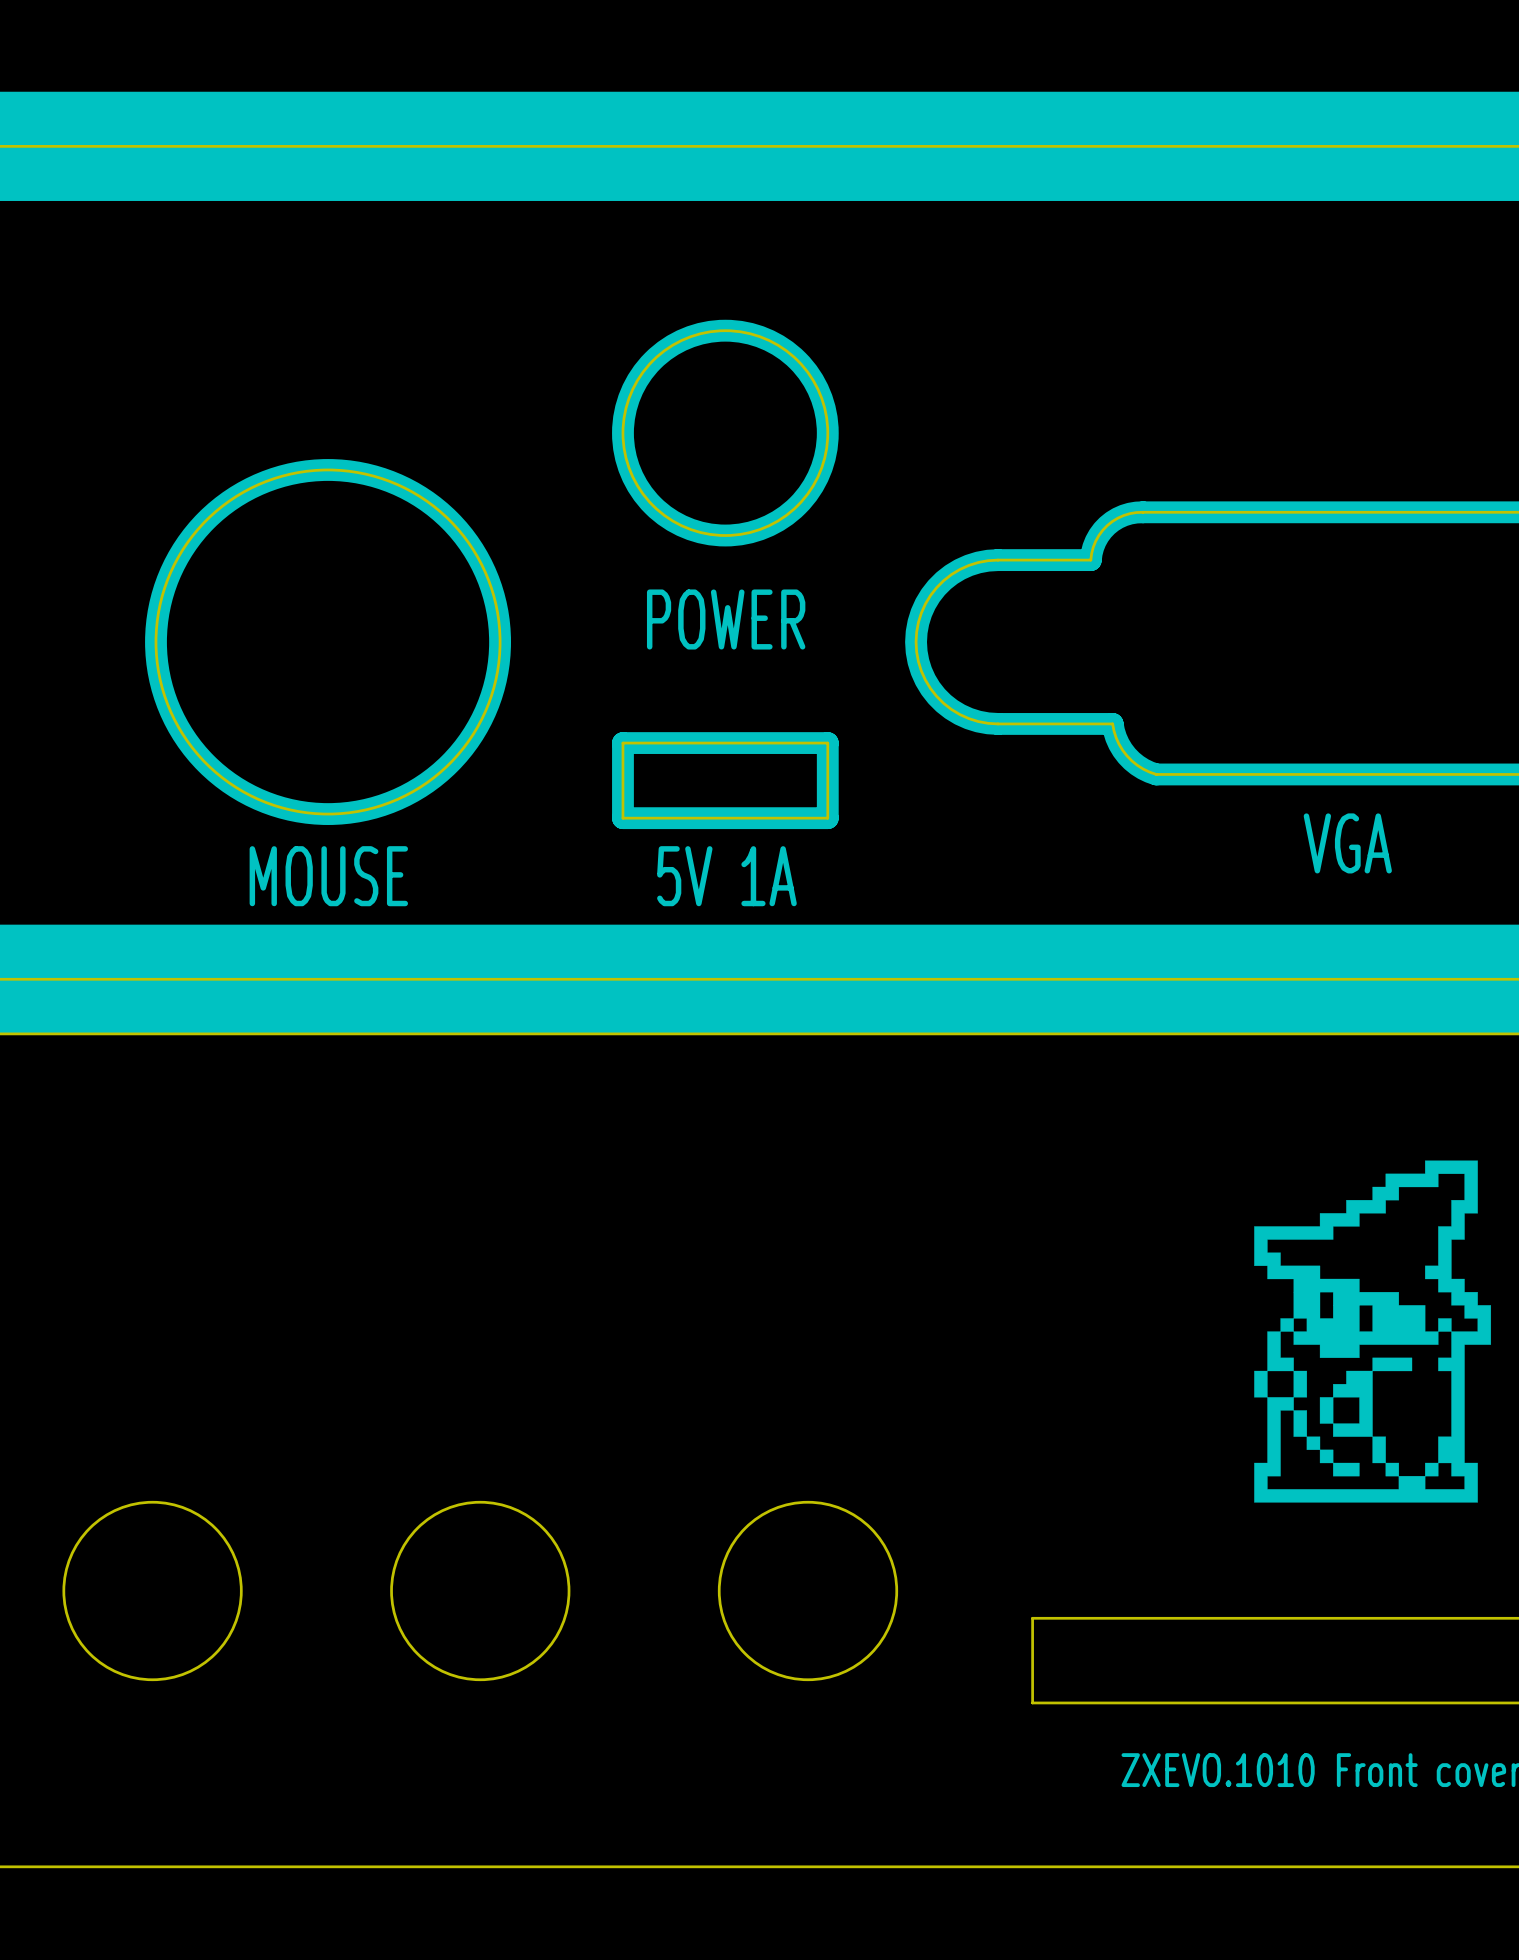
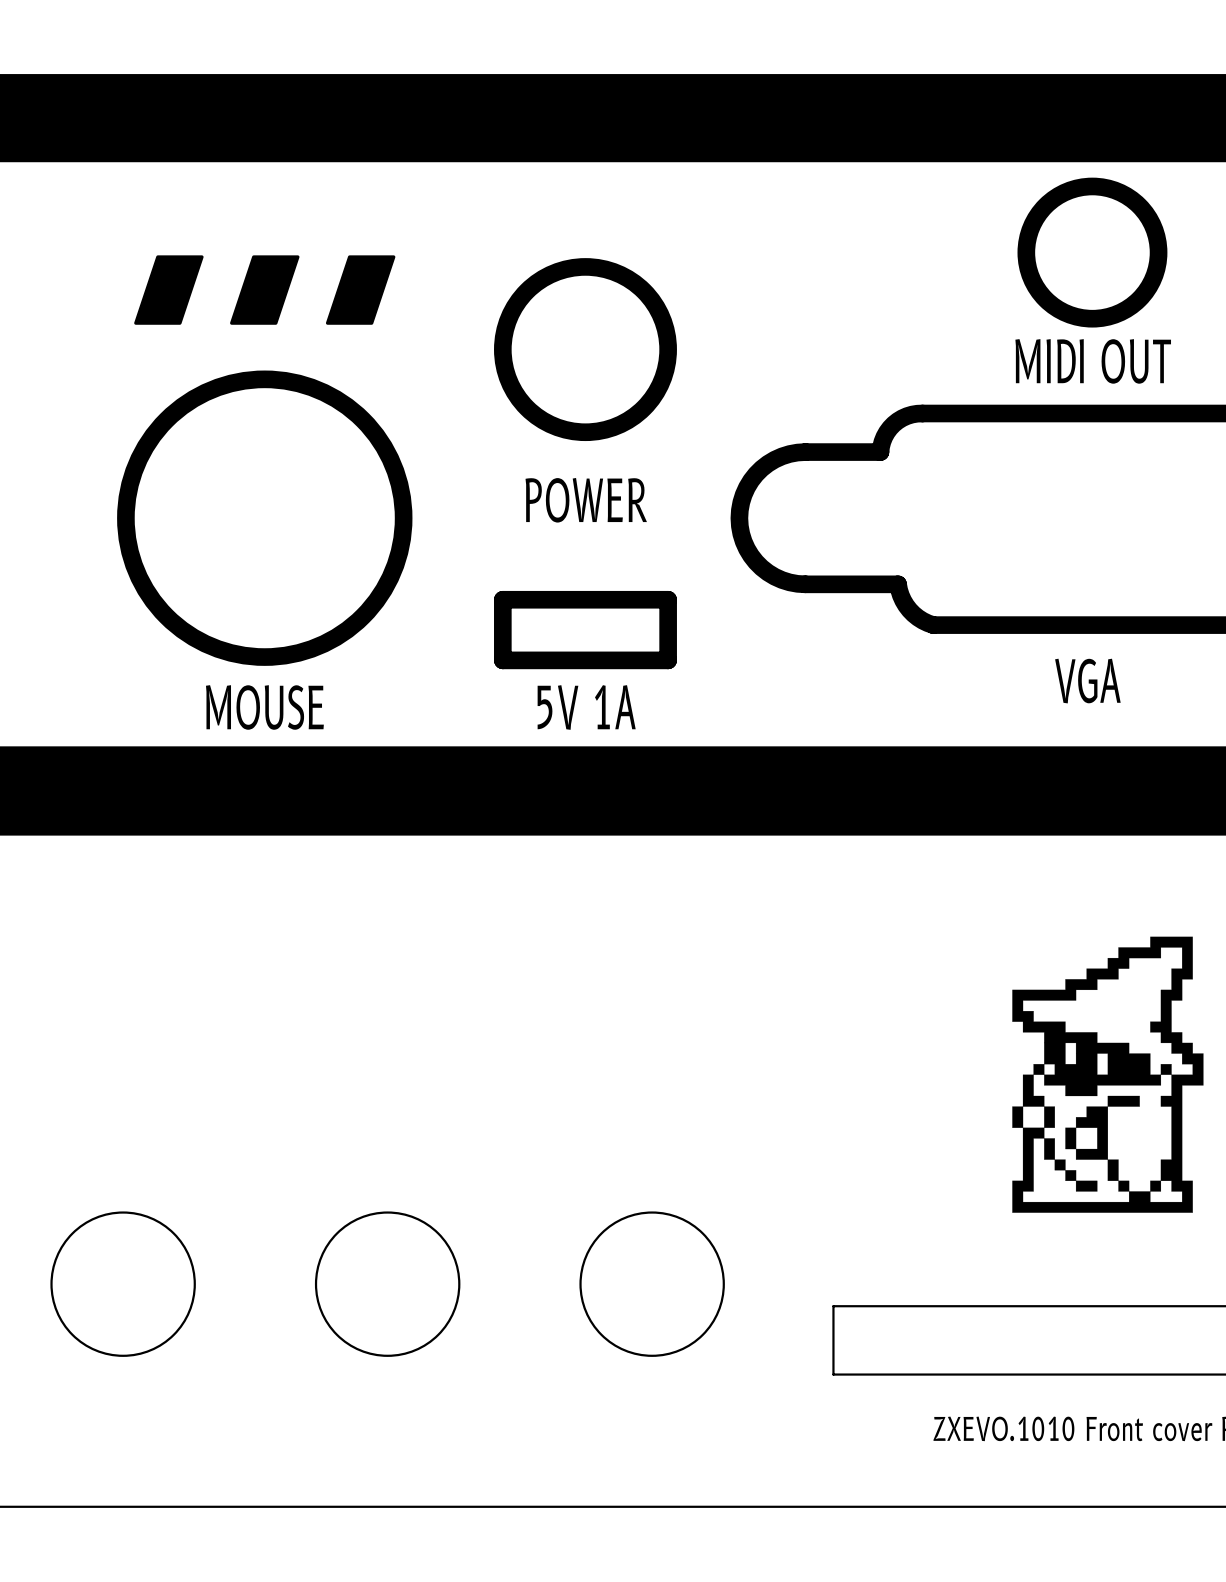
drawing: none -> [1017, 177, 1168, 328]
drawing: none -> [134, 255, 204, 325]
drawing: none -> [230, 255, 300, 325]
drawing: none -> [325, 255, 396, 325]
text: none -> MIDI OUT (1093, 361)

